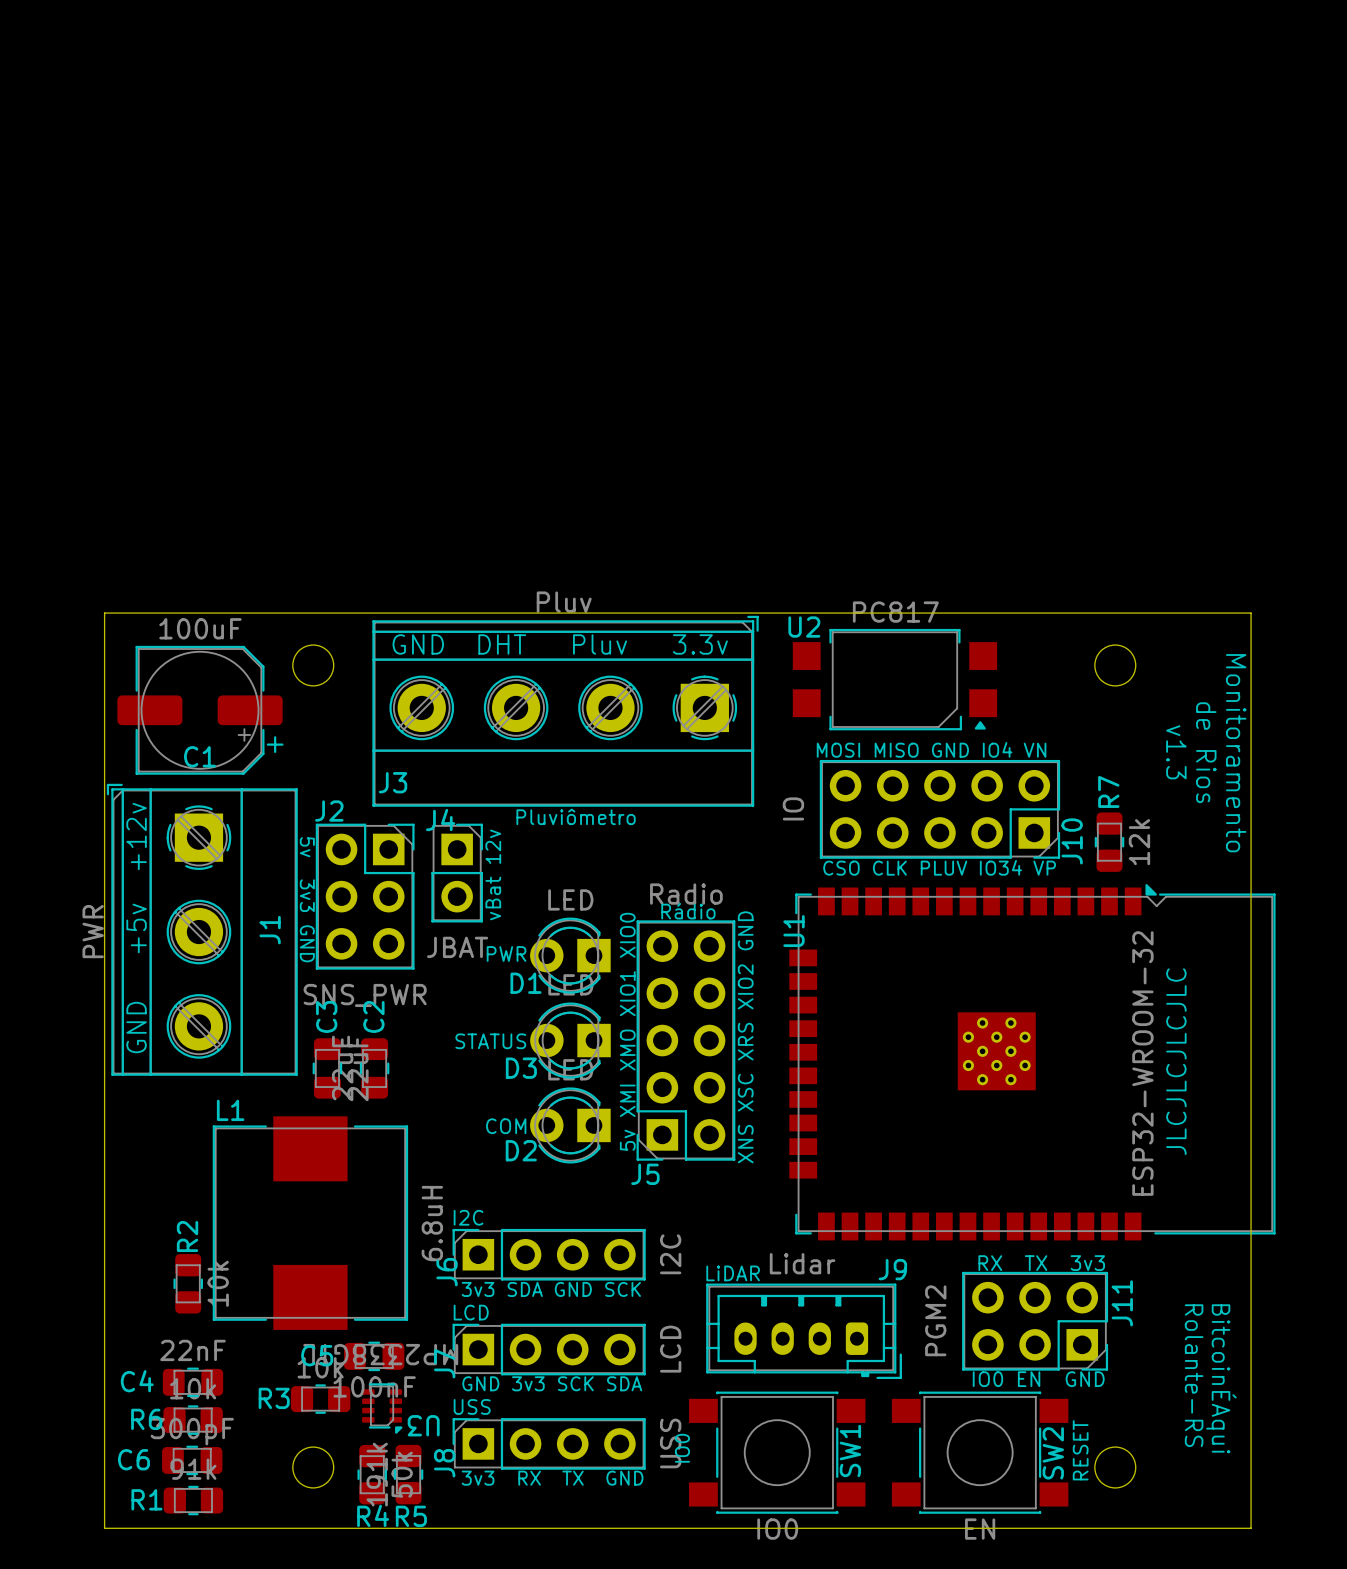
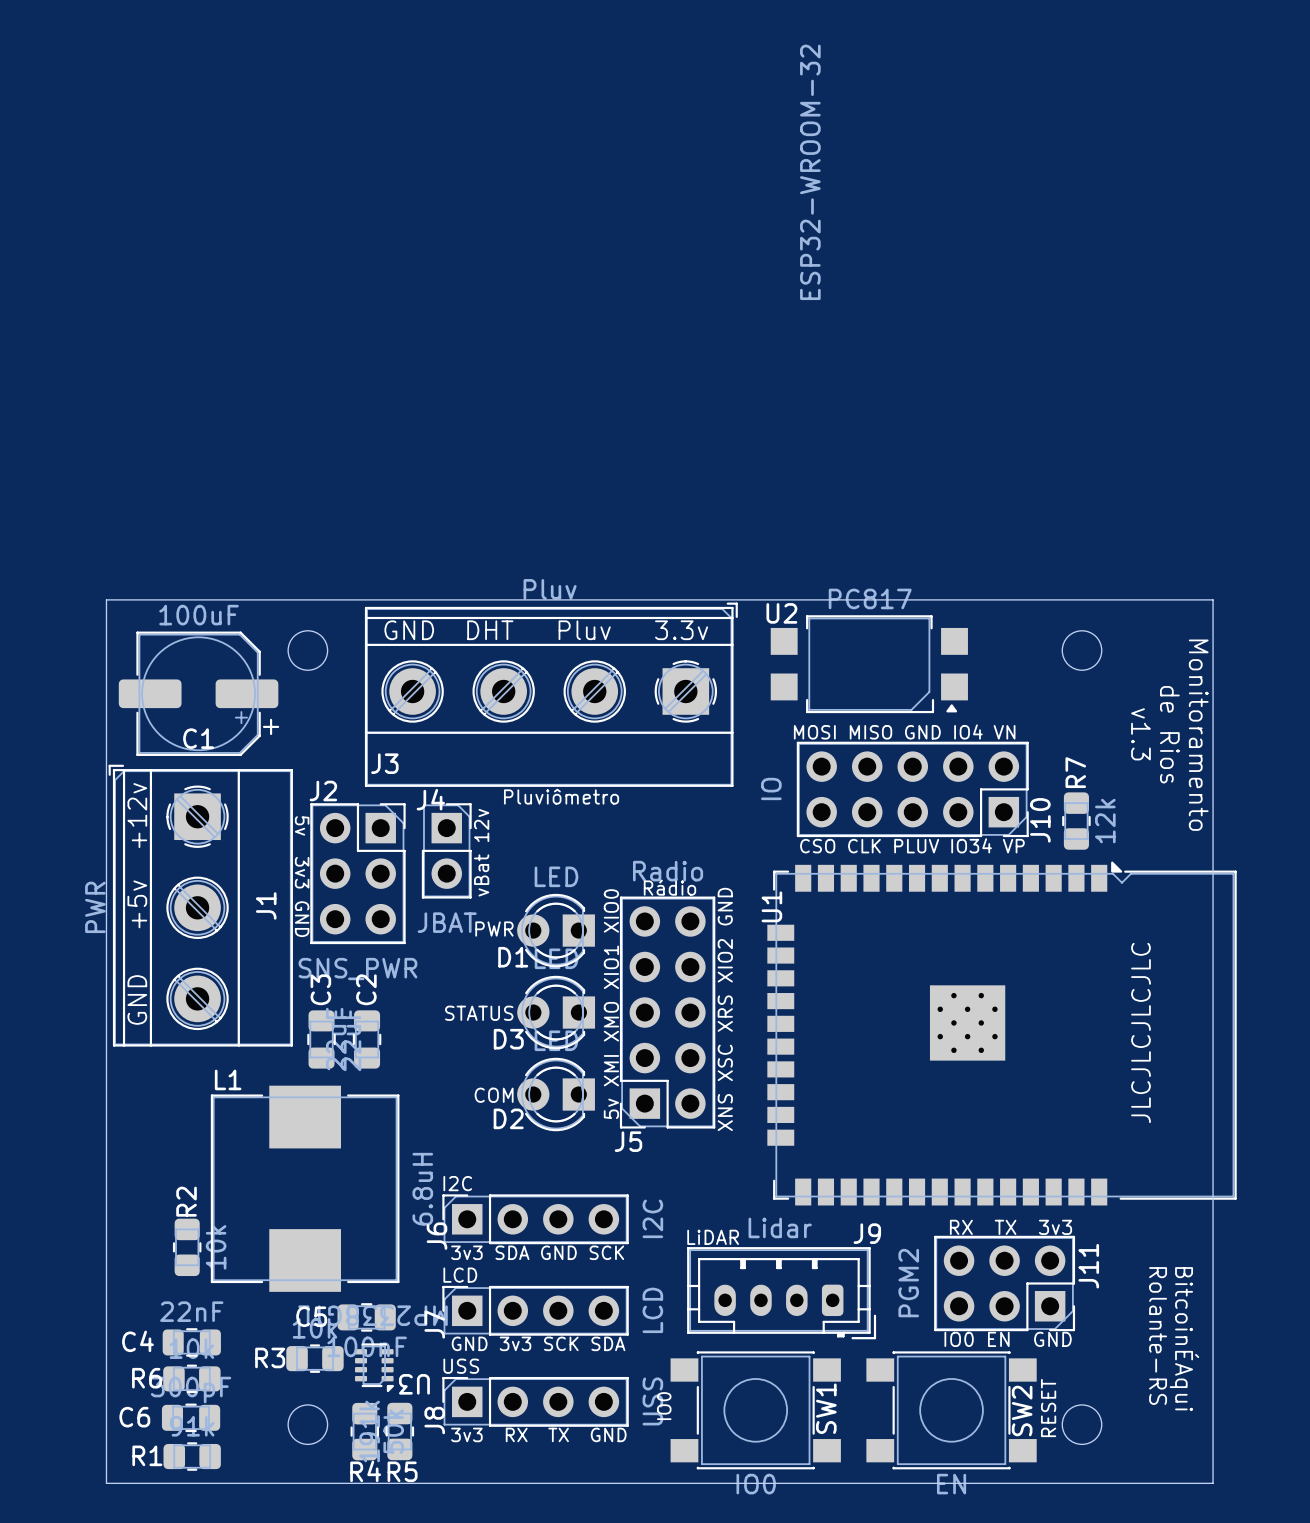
U1 value position: ESP32-WROOM-32 (1142, 1063) -> ESP32-WROOM-32 (810, 172)

